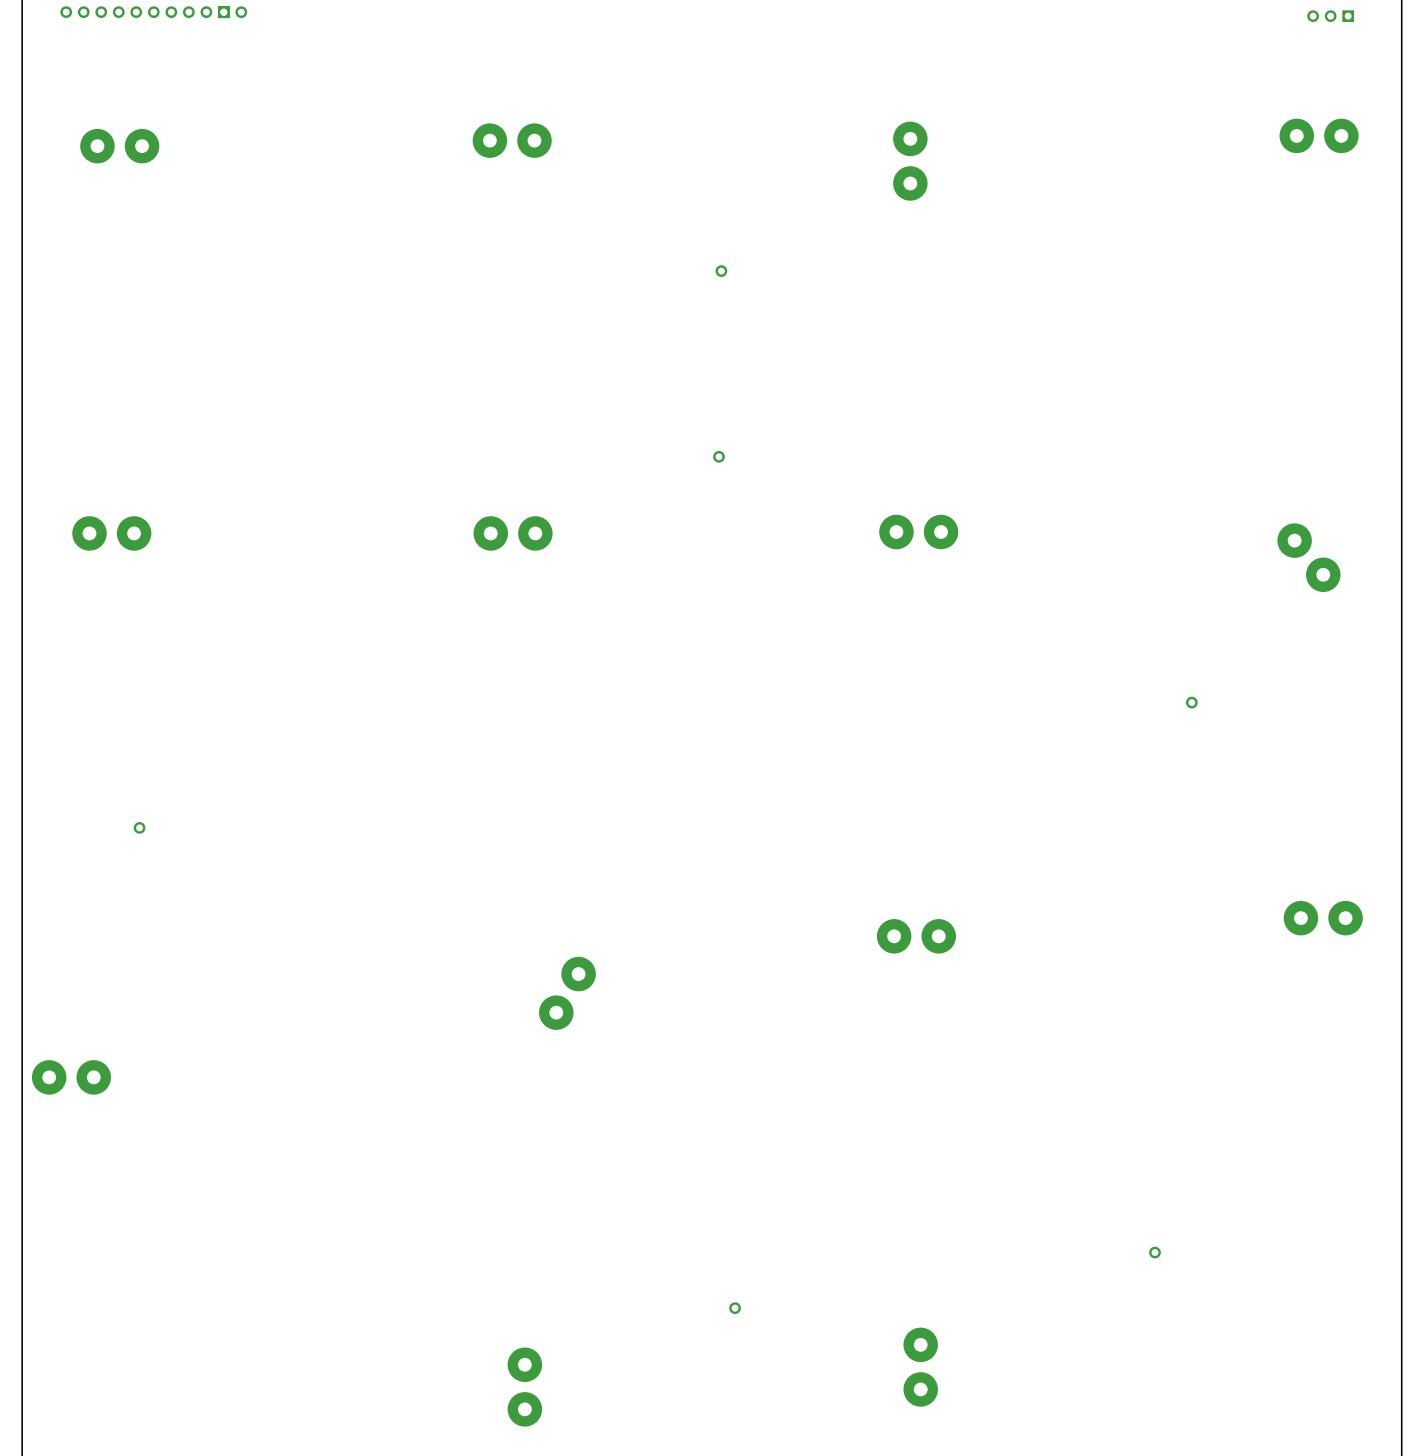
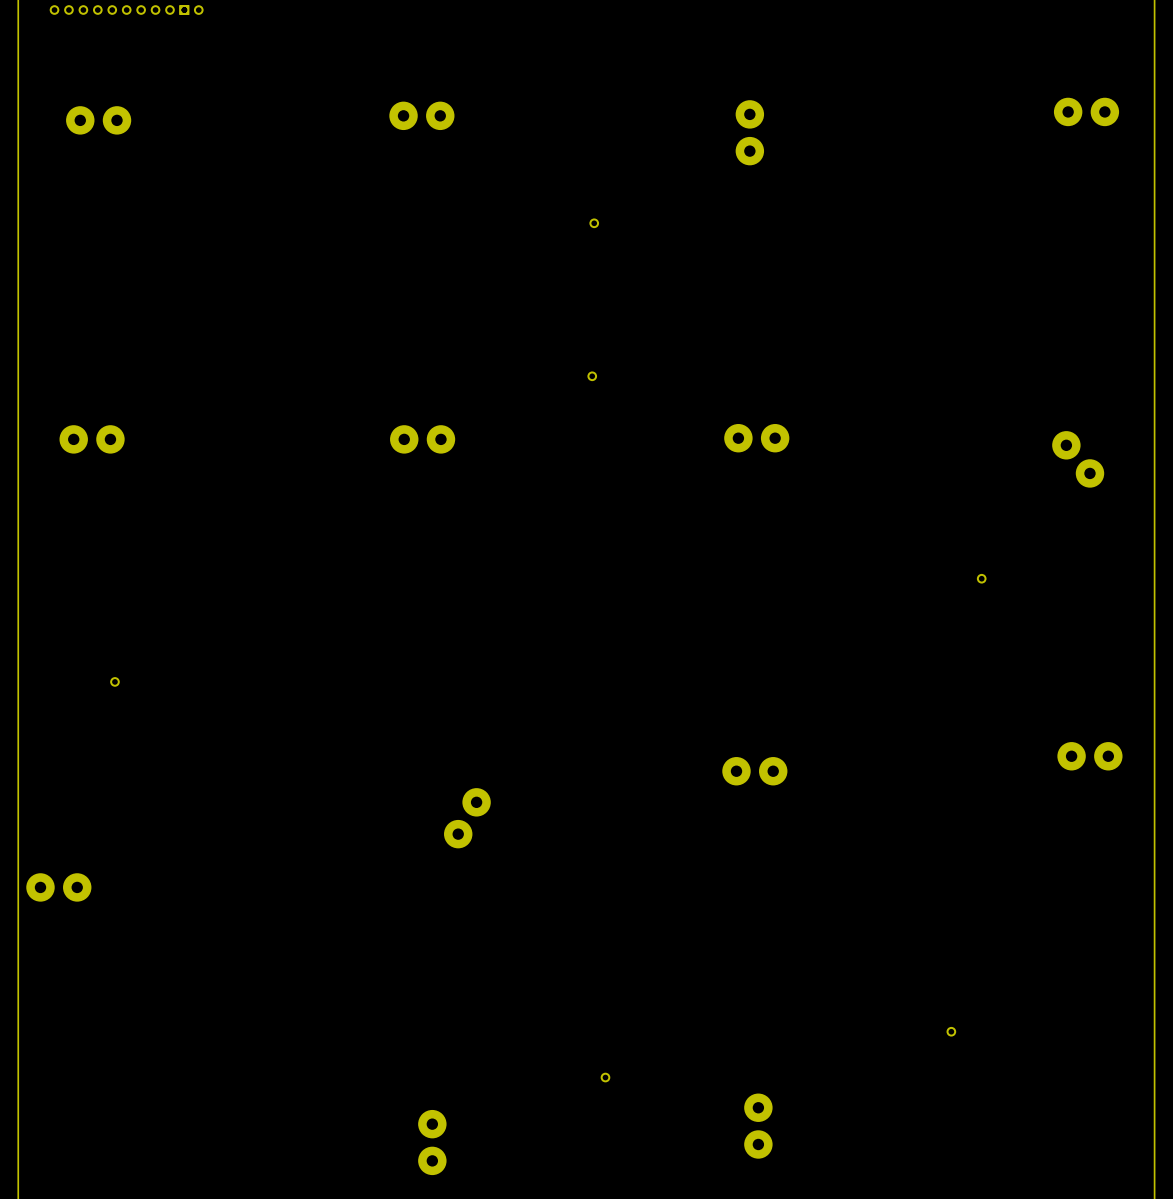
part: (1330, 16) -> none

